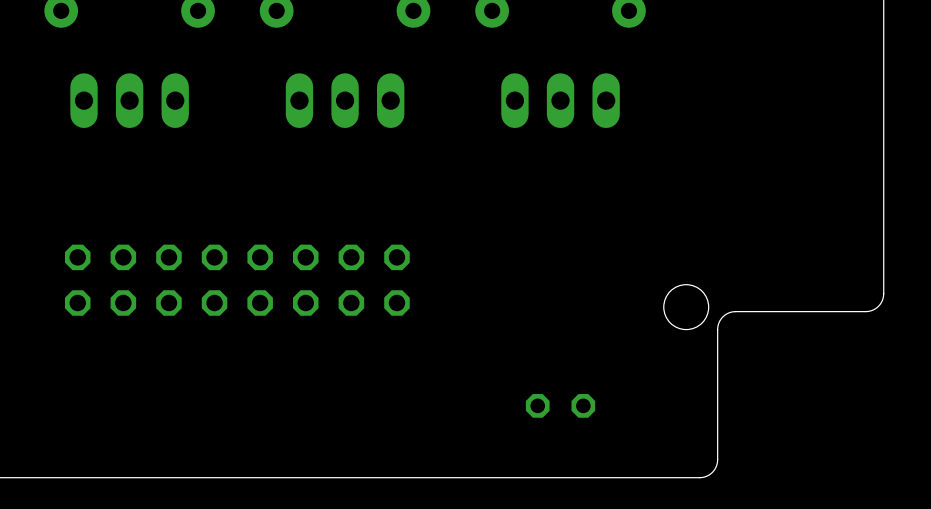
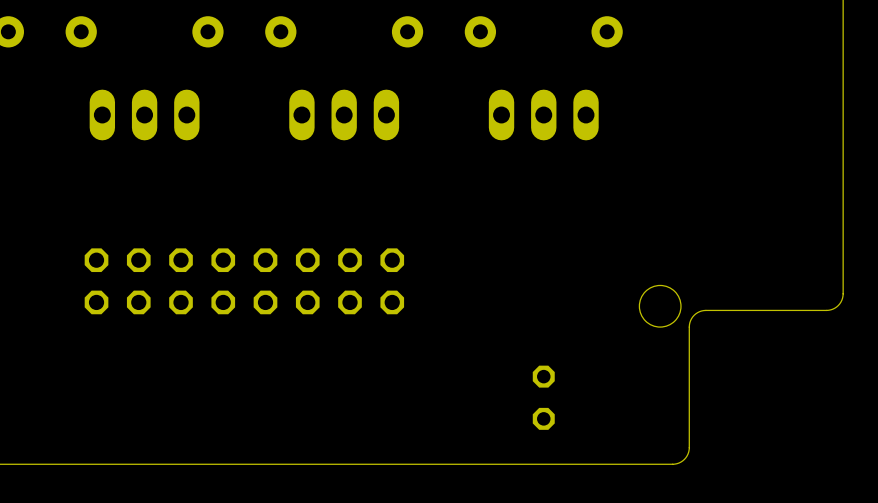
part rotation: 0° (560, 405) -> 90° clockwise (543, 397)

